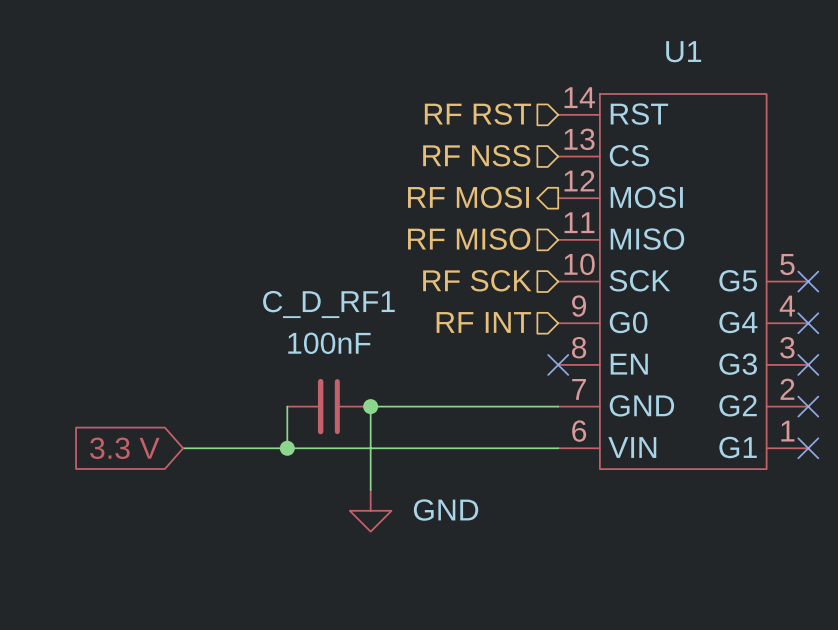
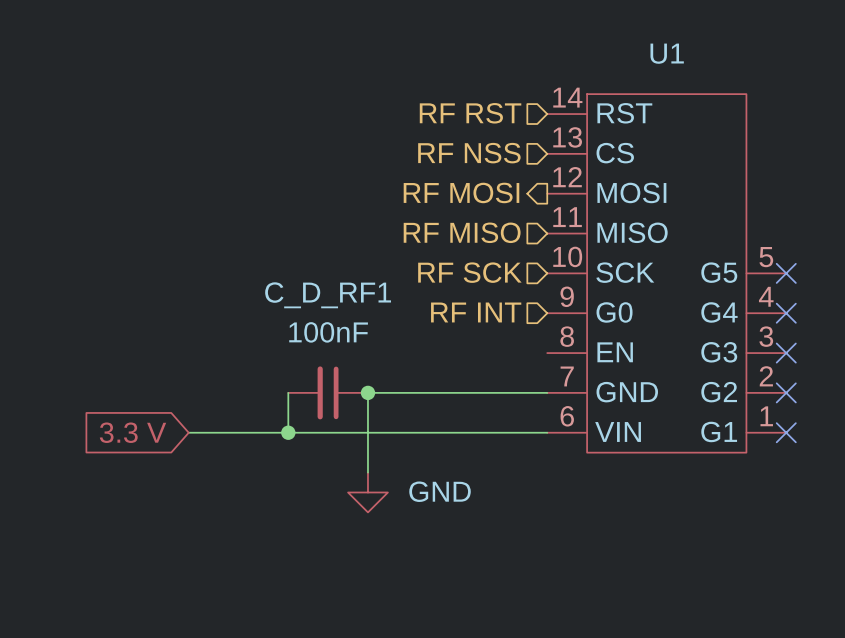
no-connect mark: (558, 364) -> none

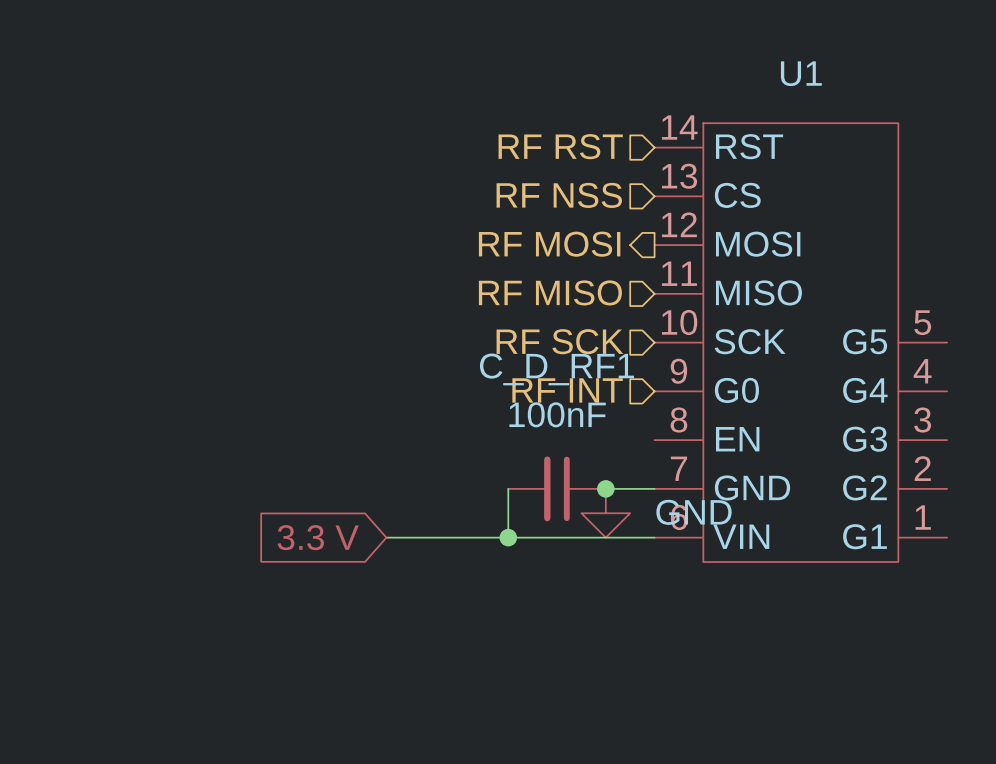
no-connect mark: (786, 273) -> none
no-connect mark: (786, 313) -> none
no-connect mark: (786, 353) -> none
wire: (288, 392) (288, 432) -> (508, 488) (508, 537)
C_D_RF1 position: (328, 392) -> (557, 488)
junction: (367, 392) -> none
wire: (507, 392) (367, 392) (367, 472) -> none
junction: none -> (605, 488)
no-connect mark: (786, 392) -> none
global label position: 3.3 V (133, 432) -> 3.3 V (318, 537)
wire: (188, 432) (328, 432) -> none
junction: (288, 432) -> none
junction: none -> (508, 537)
no-connect mark: (786, 432) -> none
power symbol position: GND (367, 492) -> GND (605, 513)

